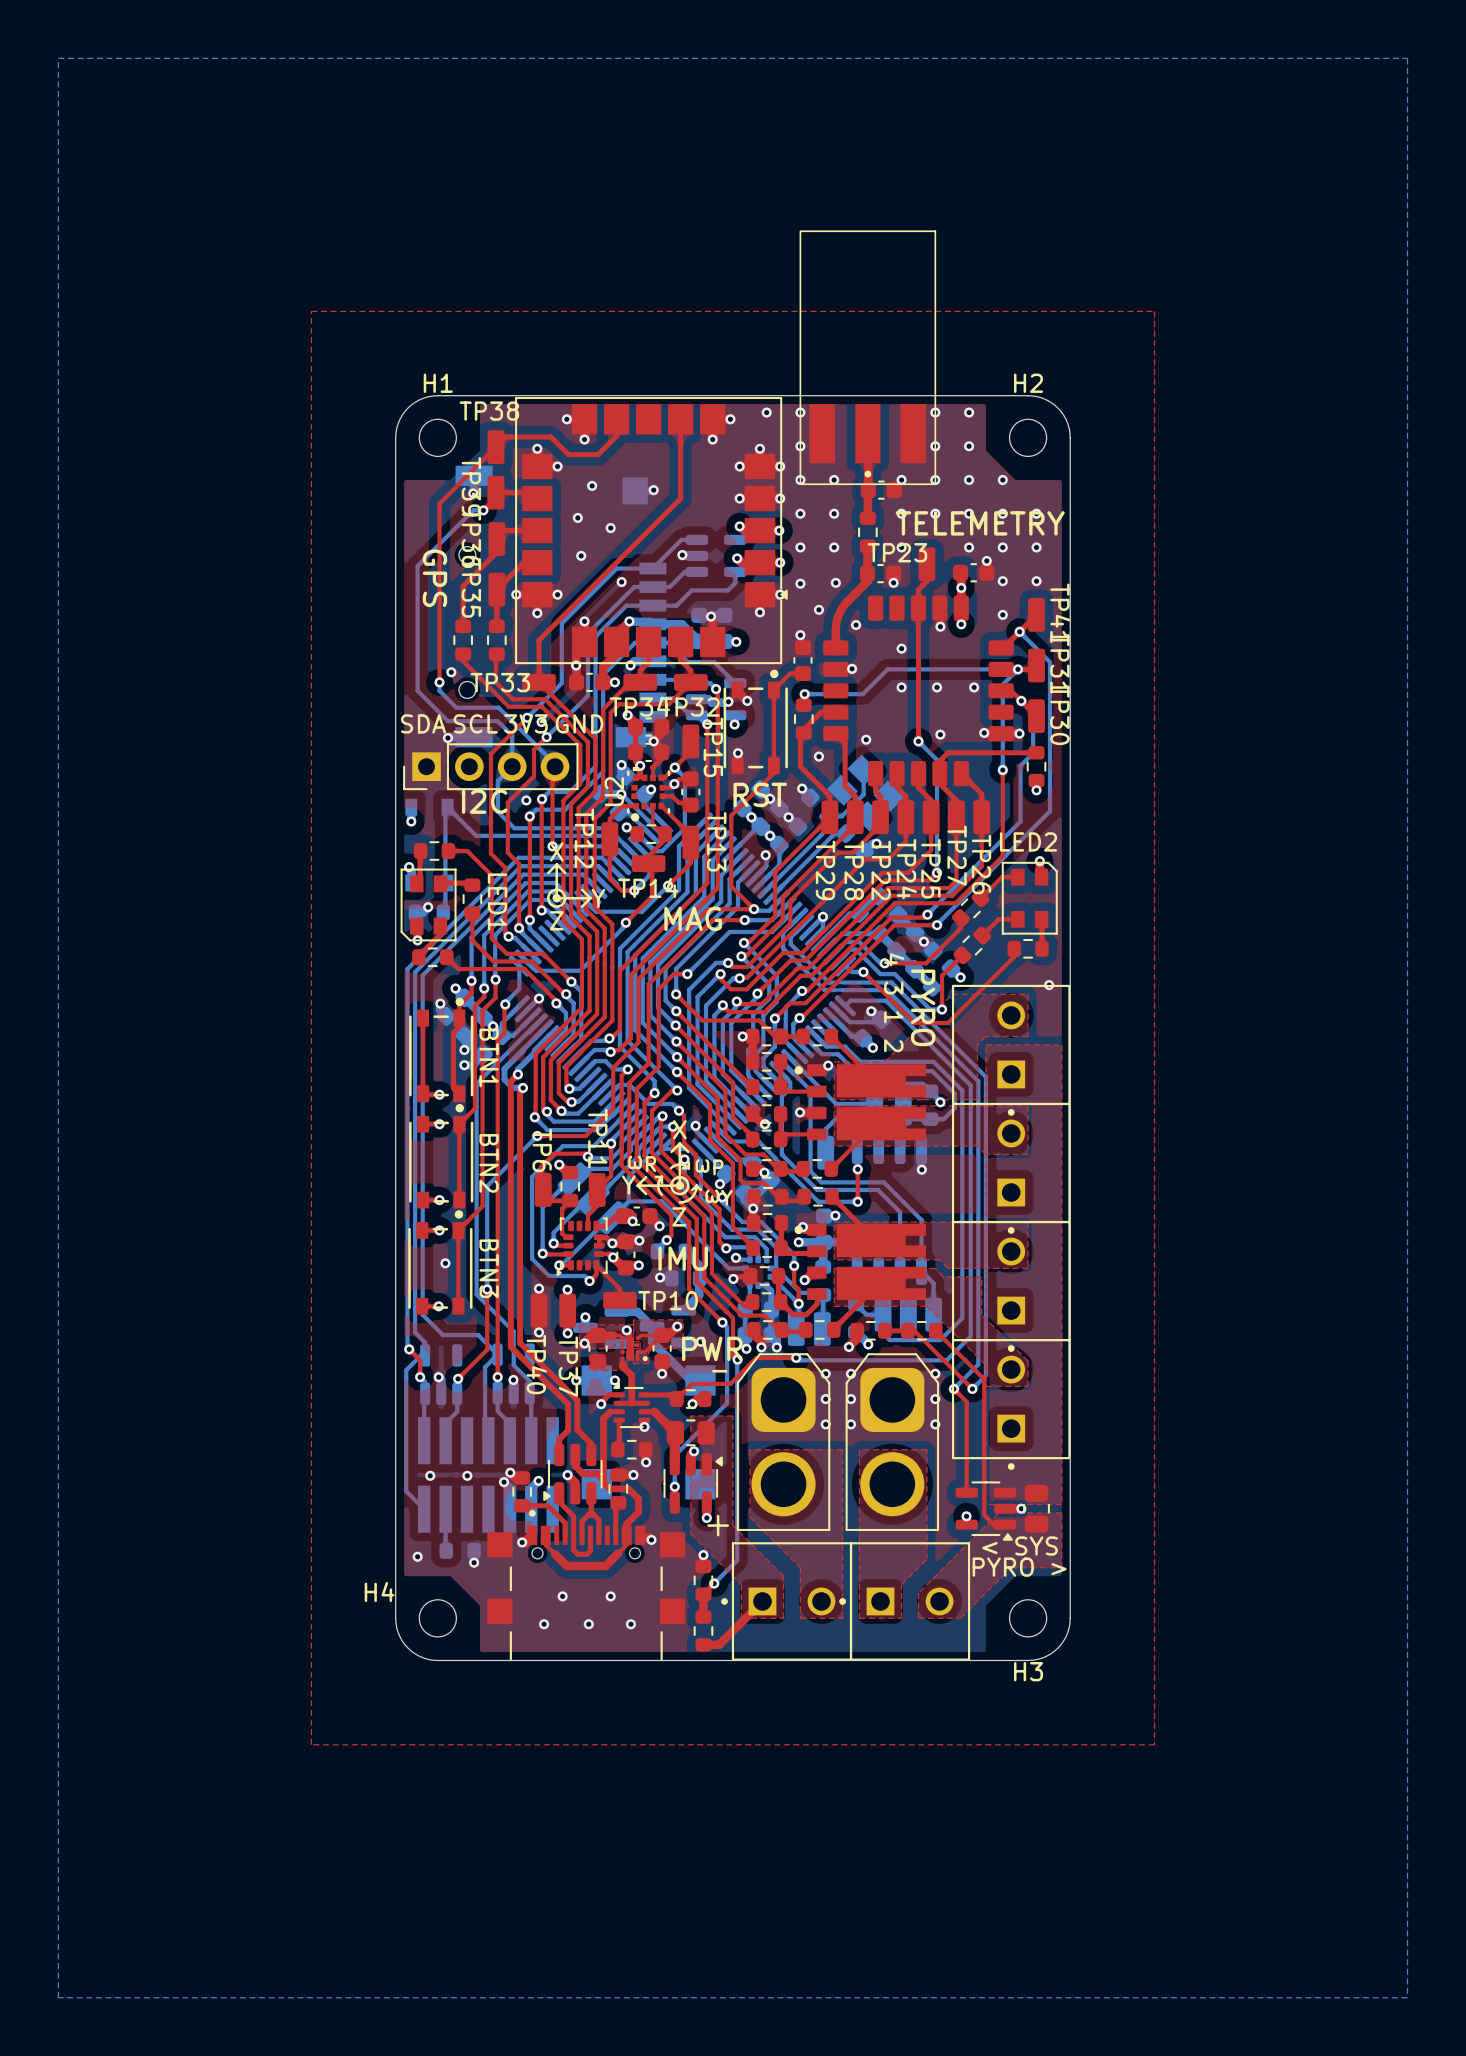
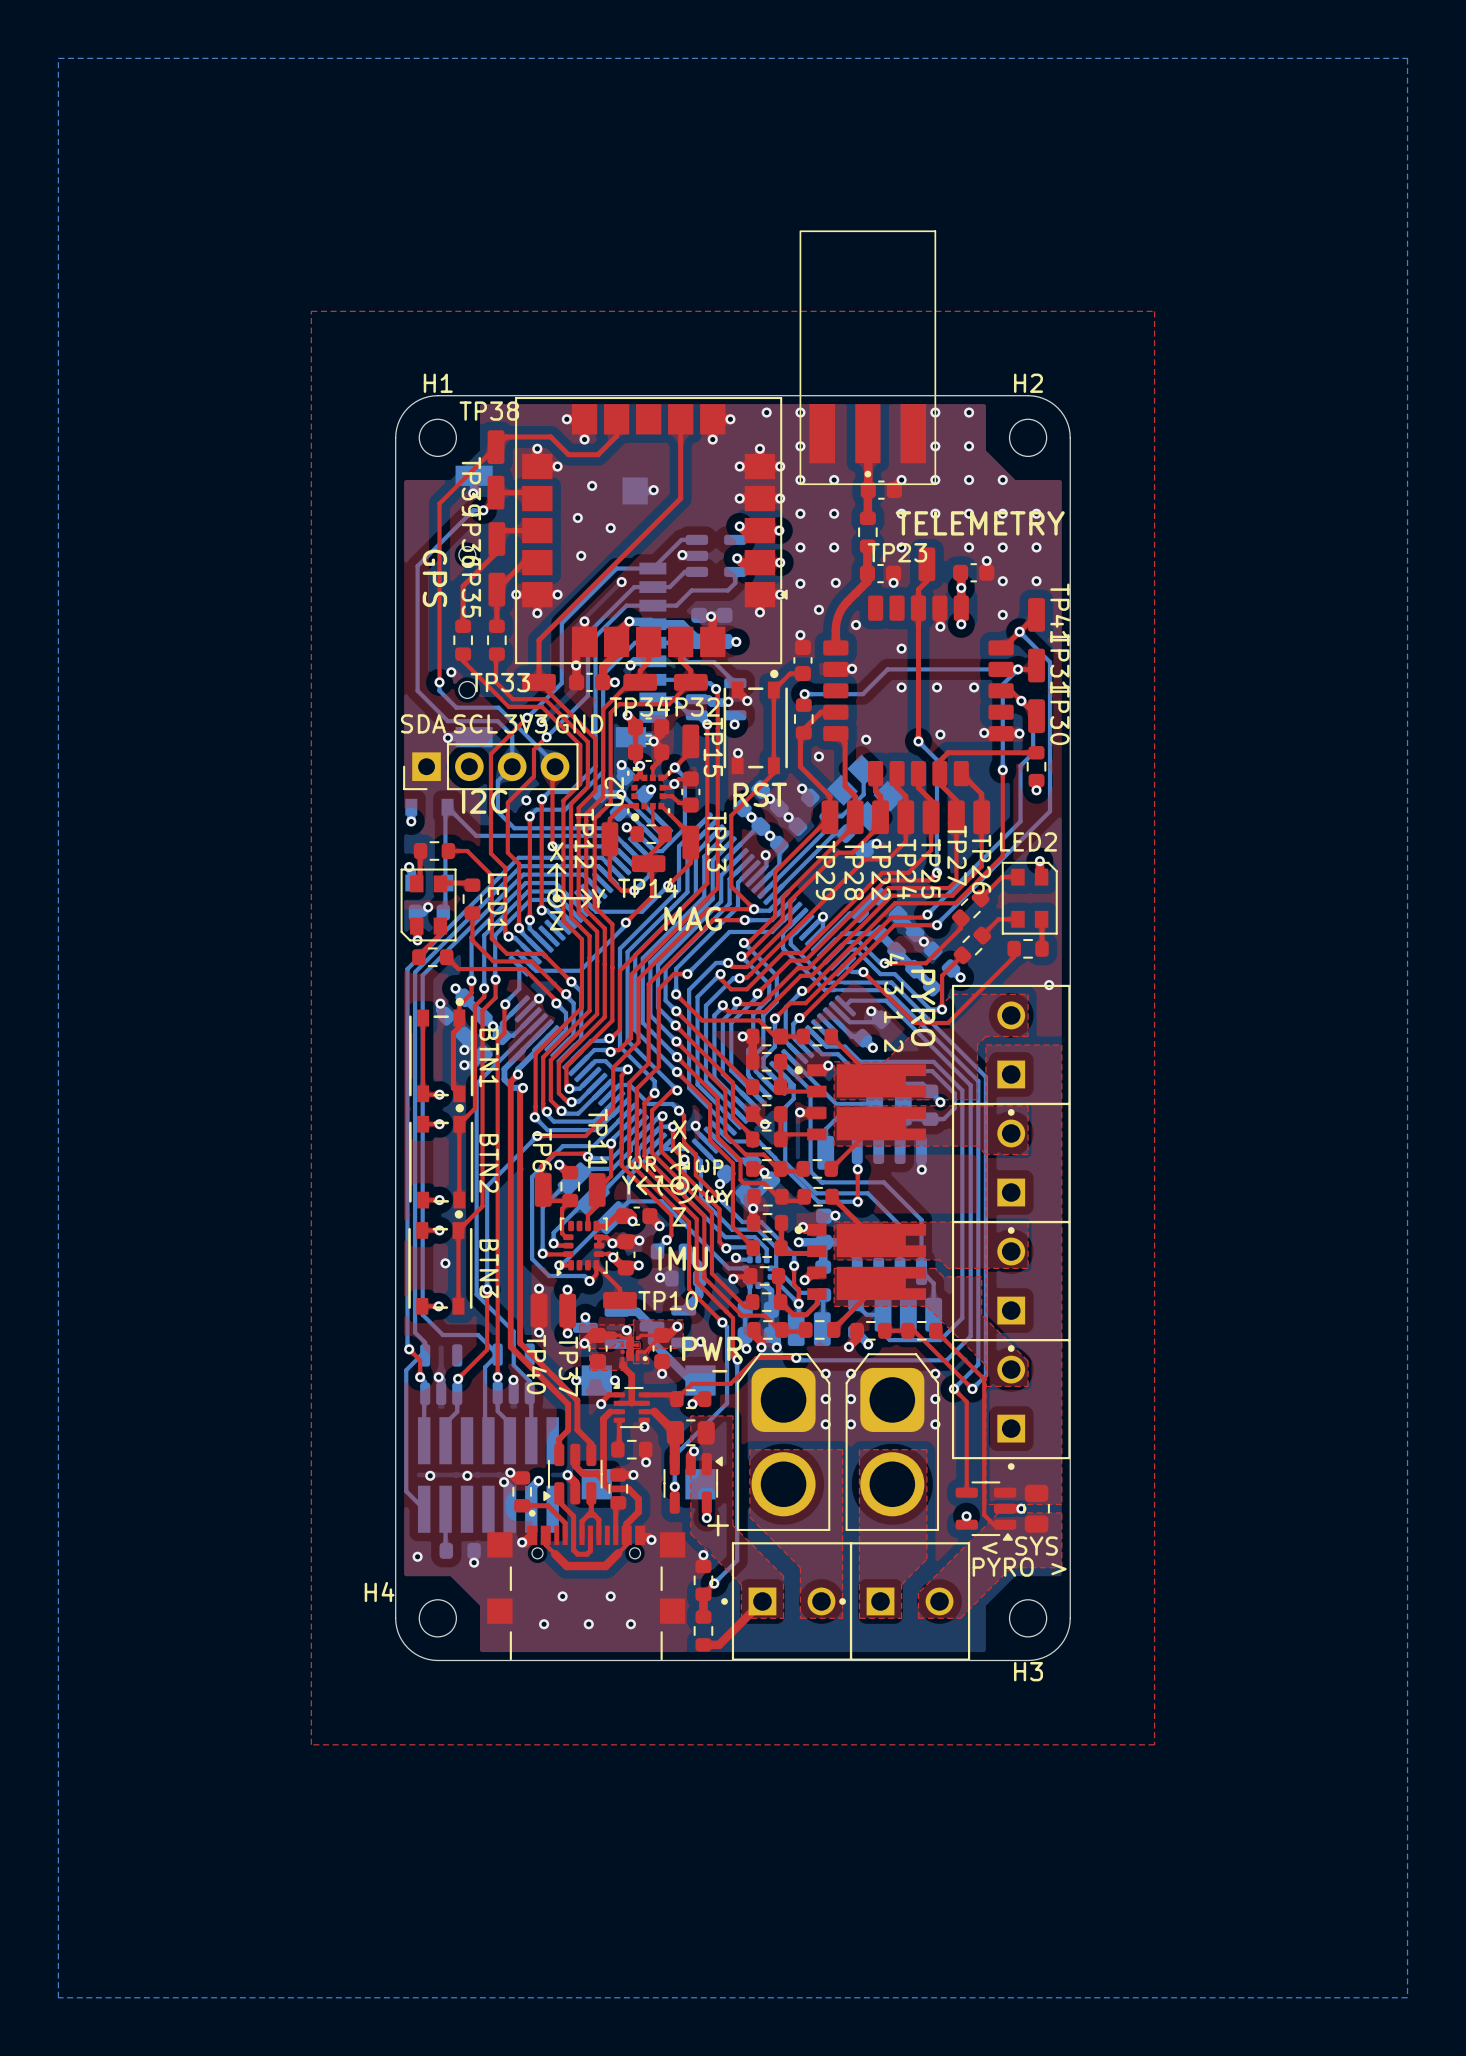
bottom track: (784, 1093) (781, 1096) (782, 1155) (817, 1189) (877, 1189) (900, 1212) (900, 1225) -> (781, 1073) (793, 1085) (793, 1098) (785, 1107) (785, 1162) (816, 1193) (867, 1193) (900, 1225)

